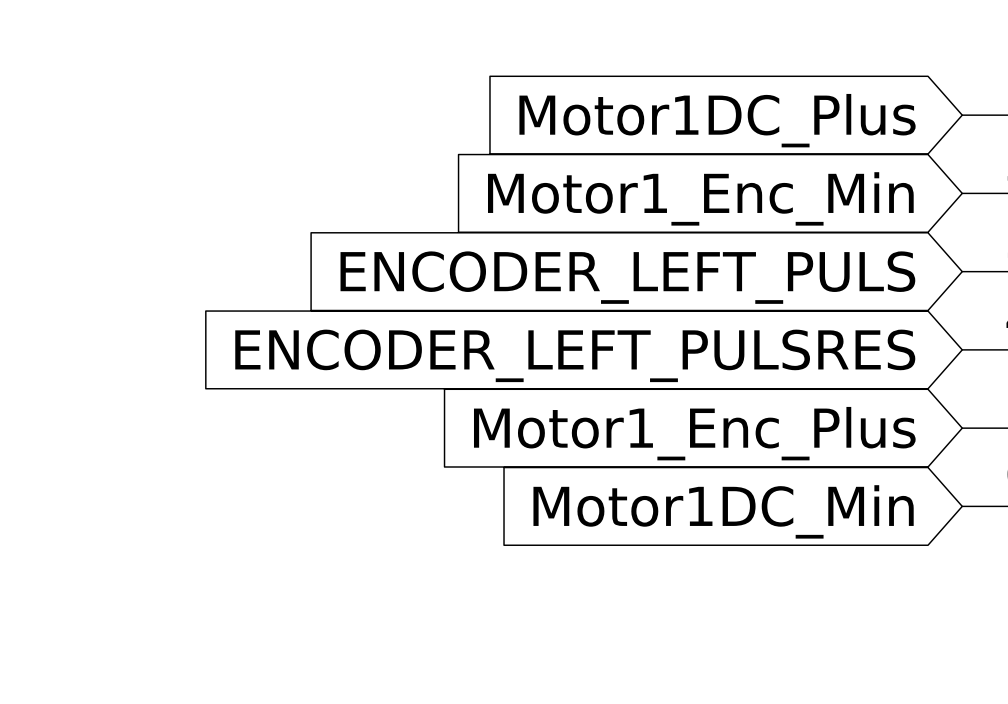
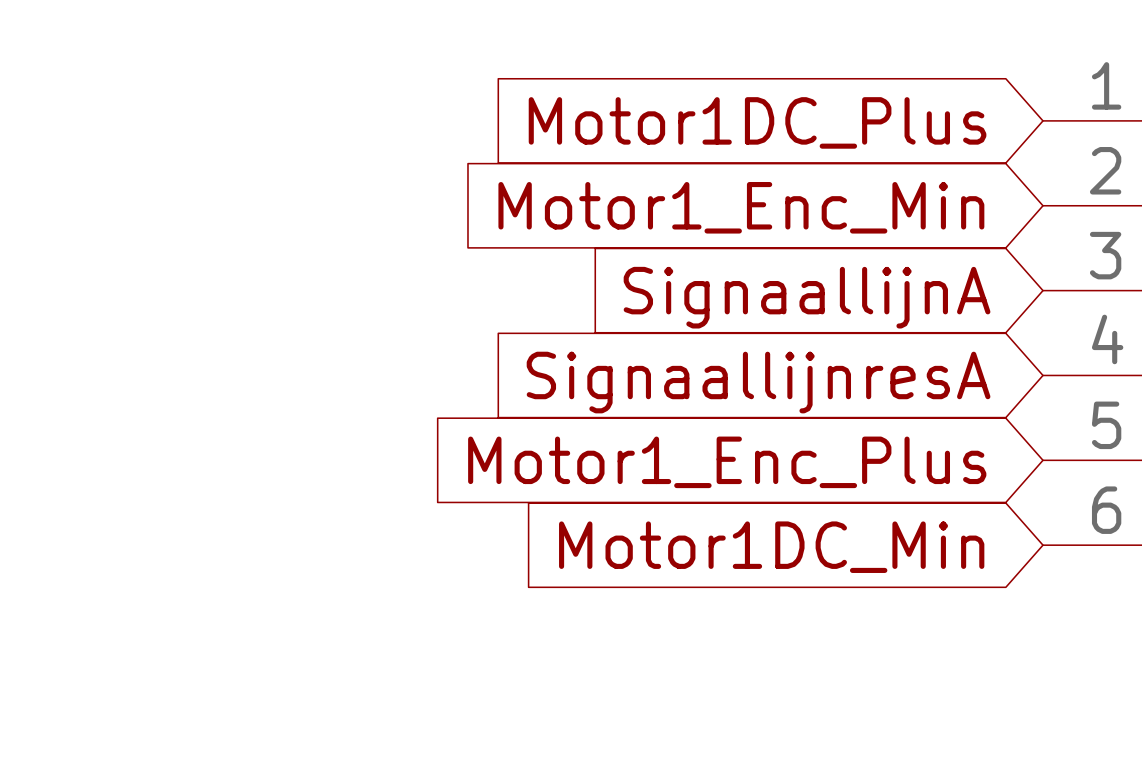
global label: ENCODER_LEFT_PULS (627, 277) -> SignaallijnA (807, 297)
global label: ENCODER_LEFT_PULSRES (575, 355) -> SignaallijnresA (758, 382)

